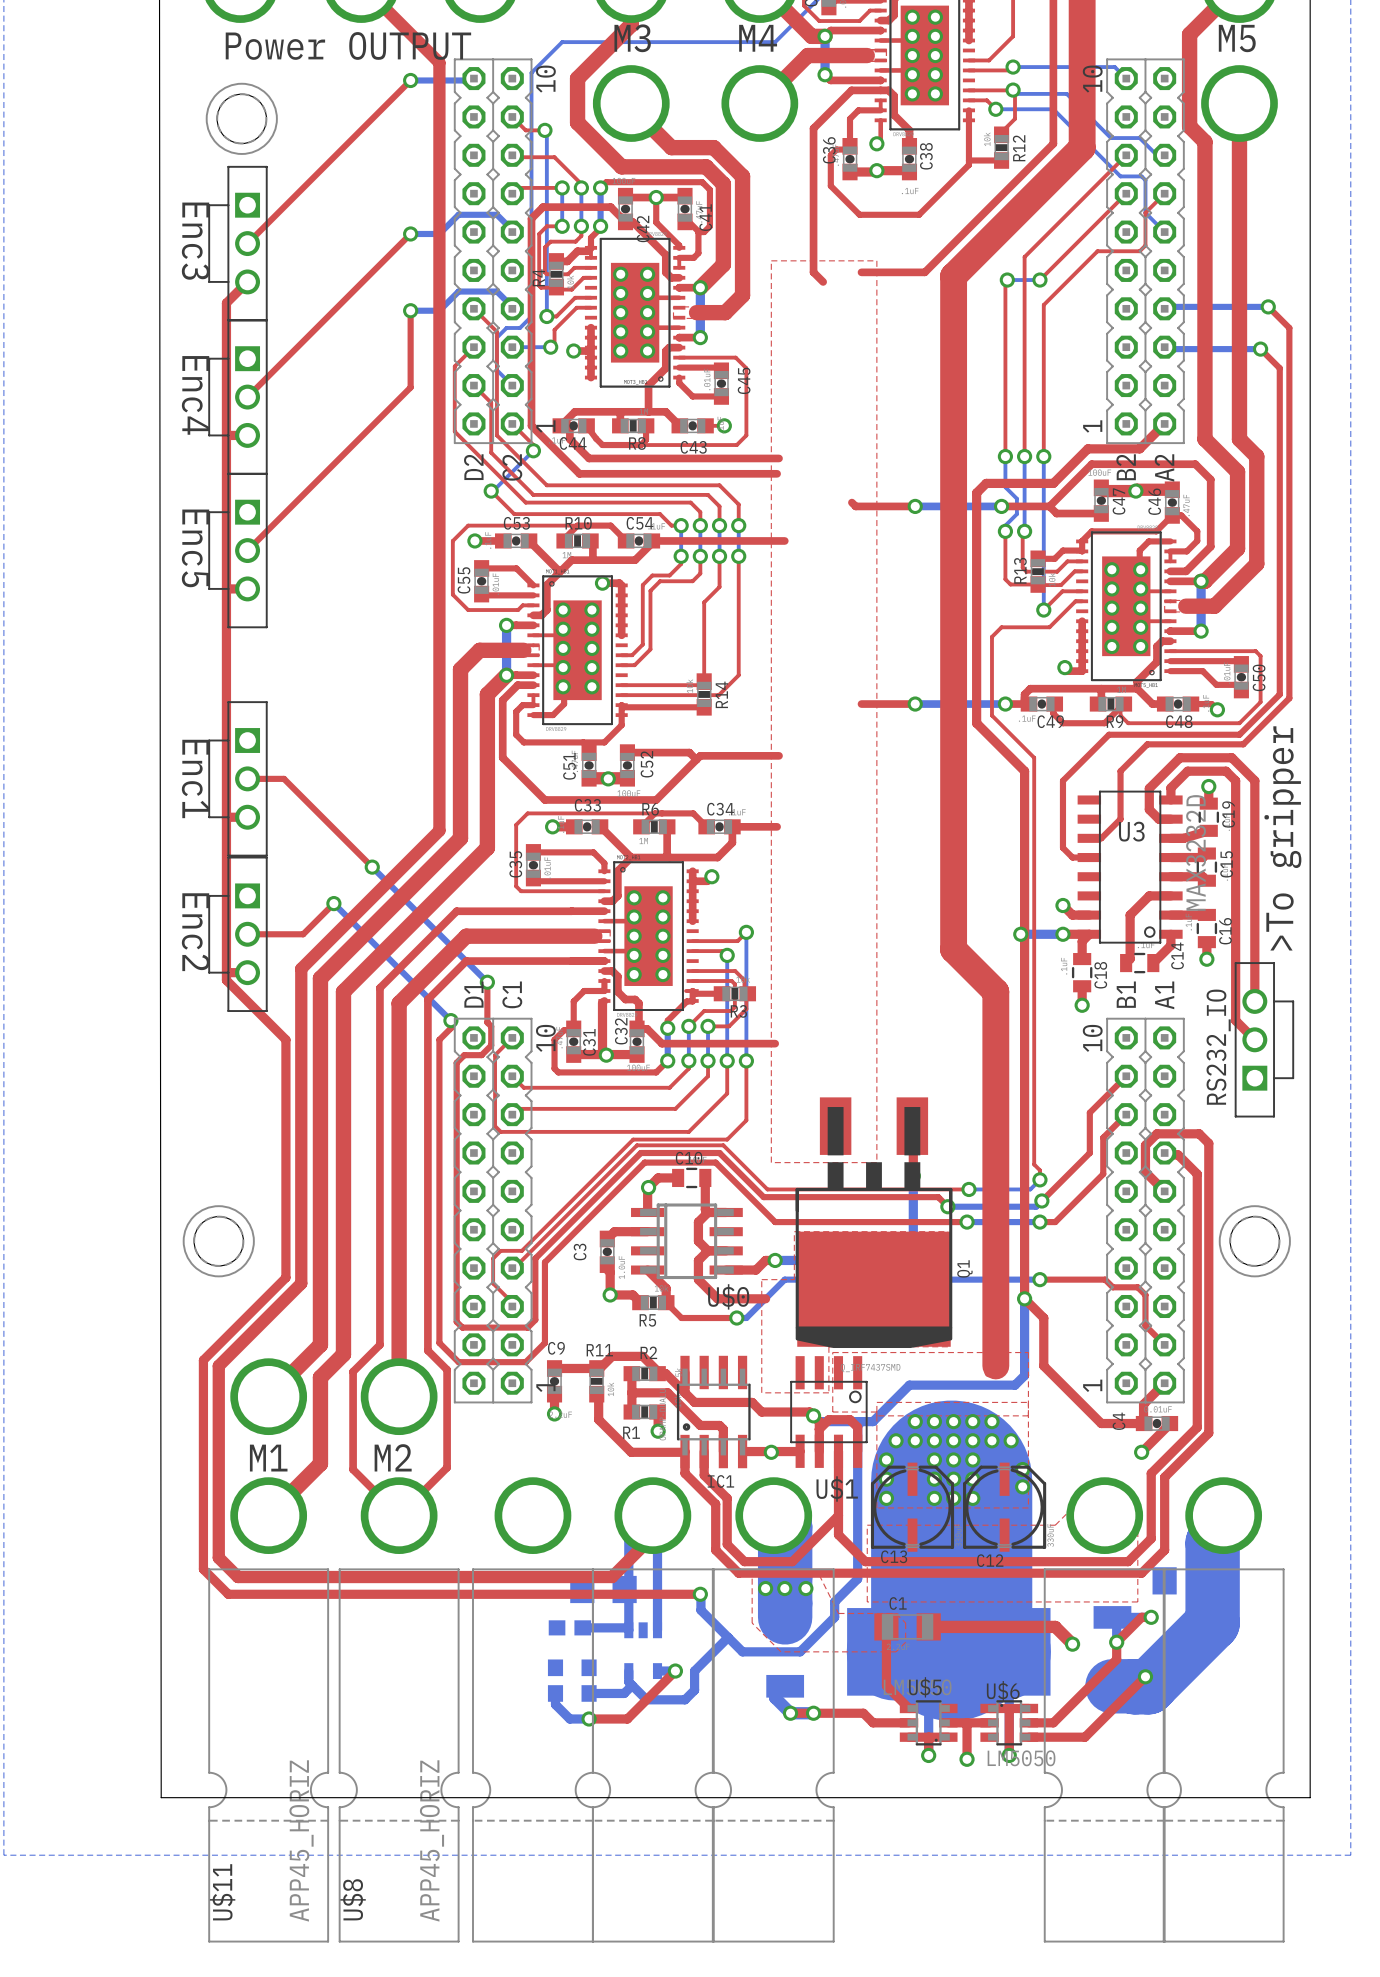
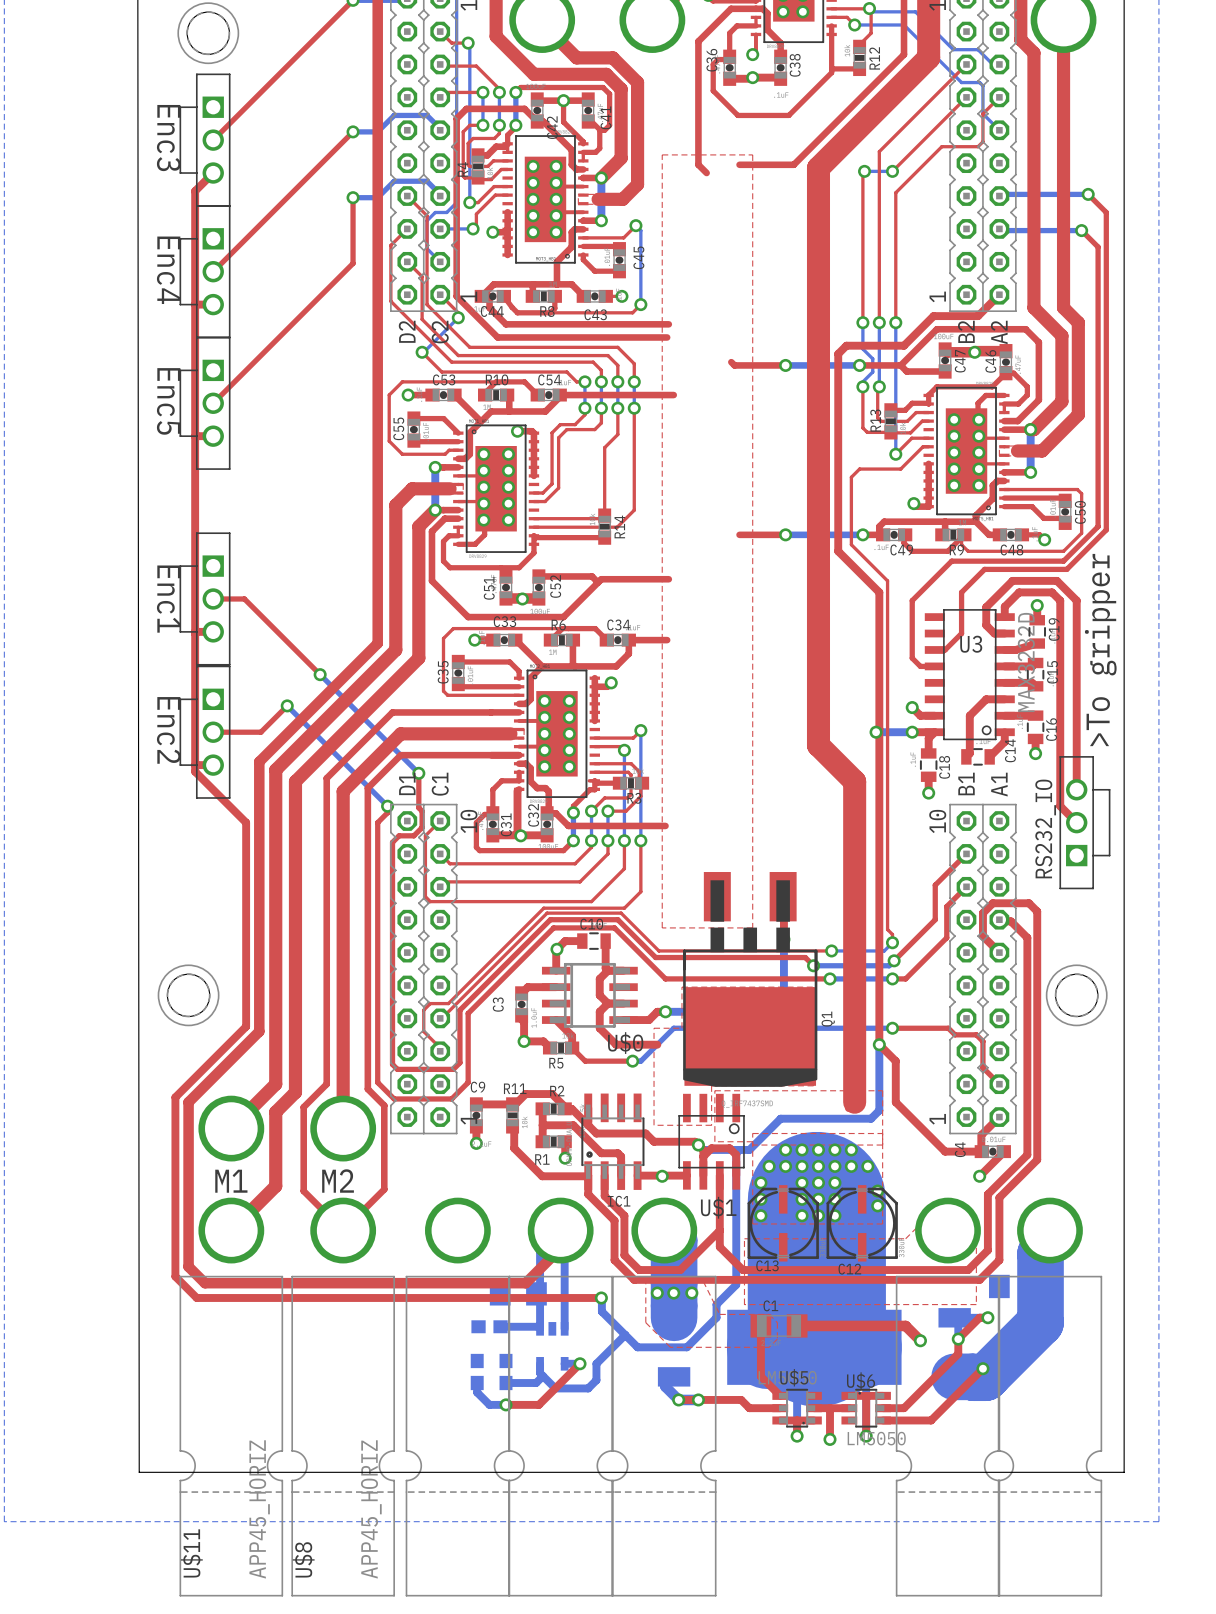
bottom track: none -> (635, 225) (640, 230) (640, 304)
via: none -> (635, 225)
top track: (726, 357) (735, 357) (746, 368) (746, 435) -> (623, 237) (635, 225)
via: none -> (640, 304)

